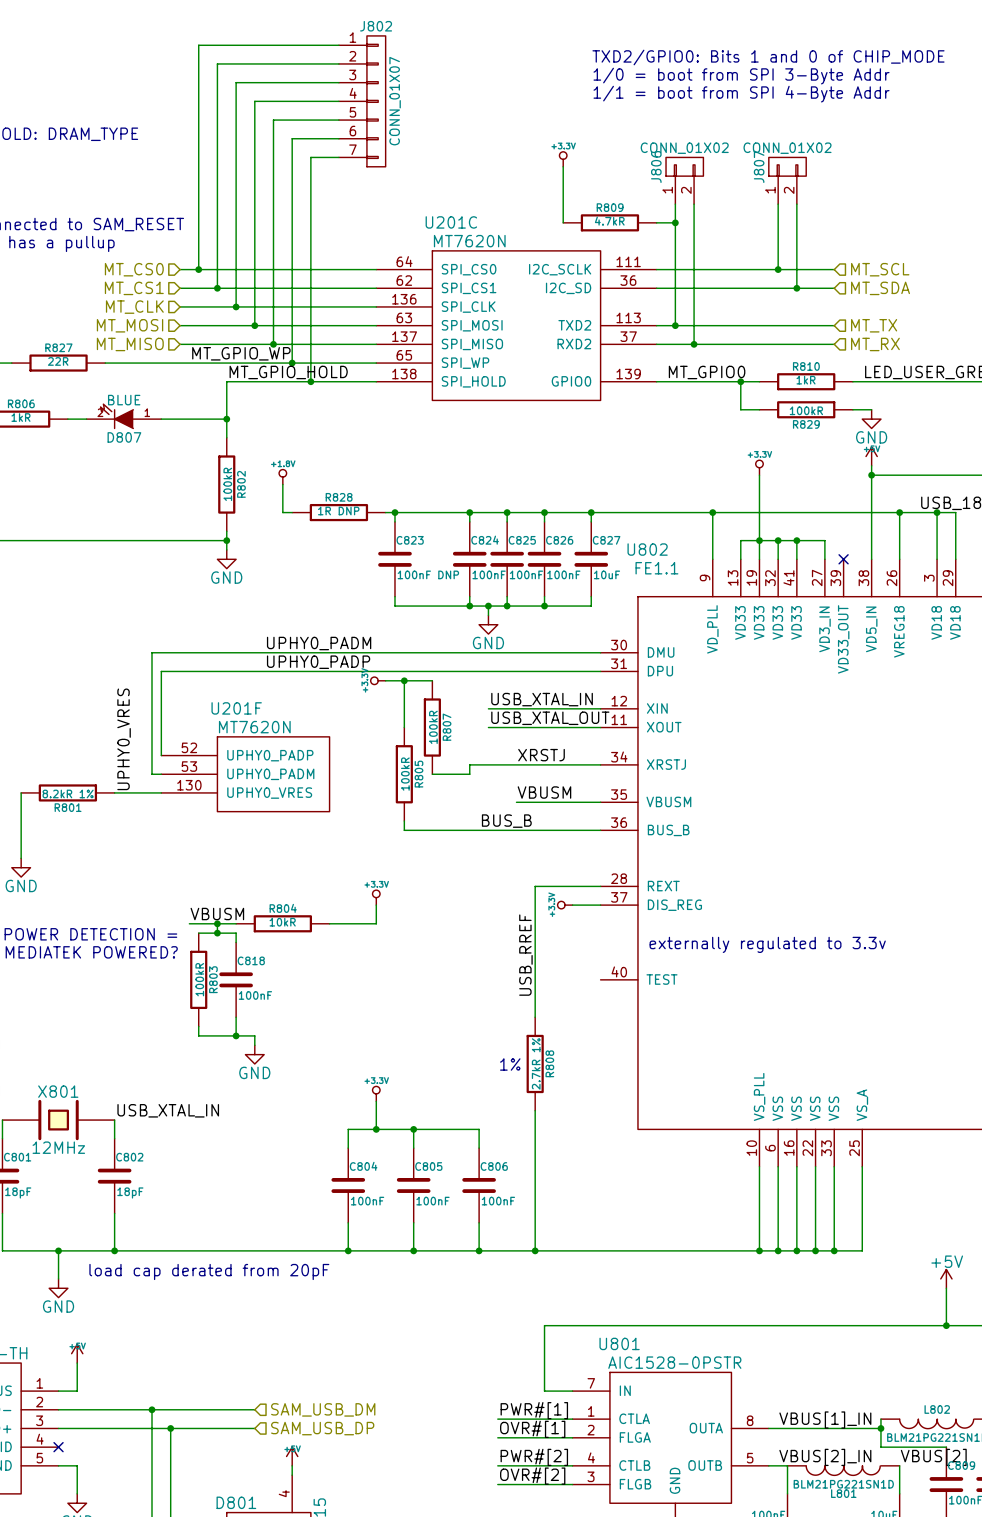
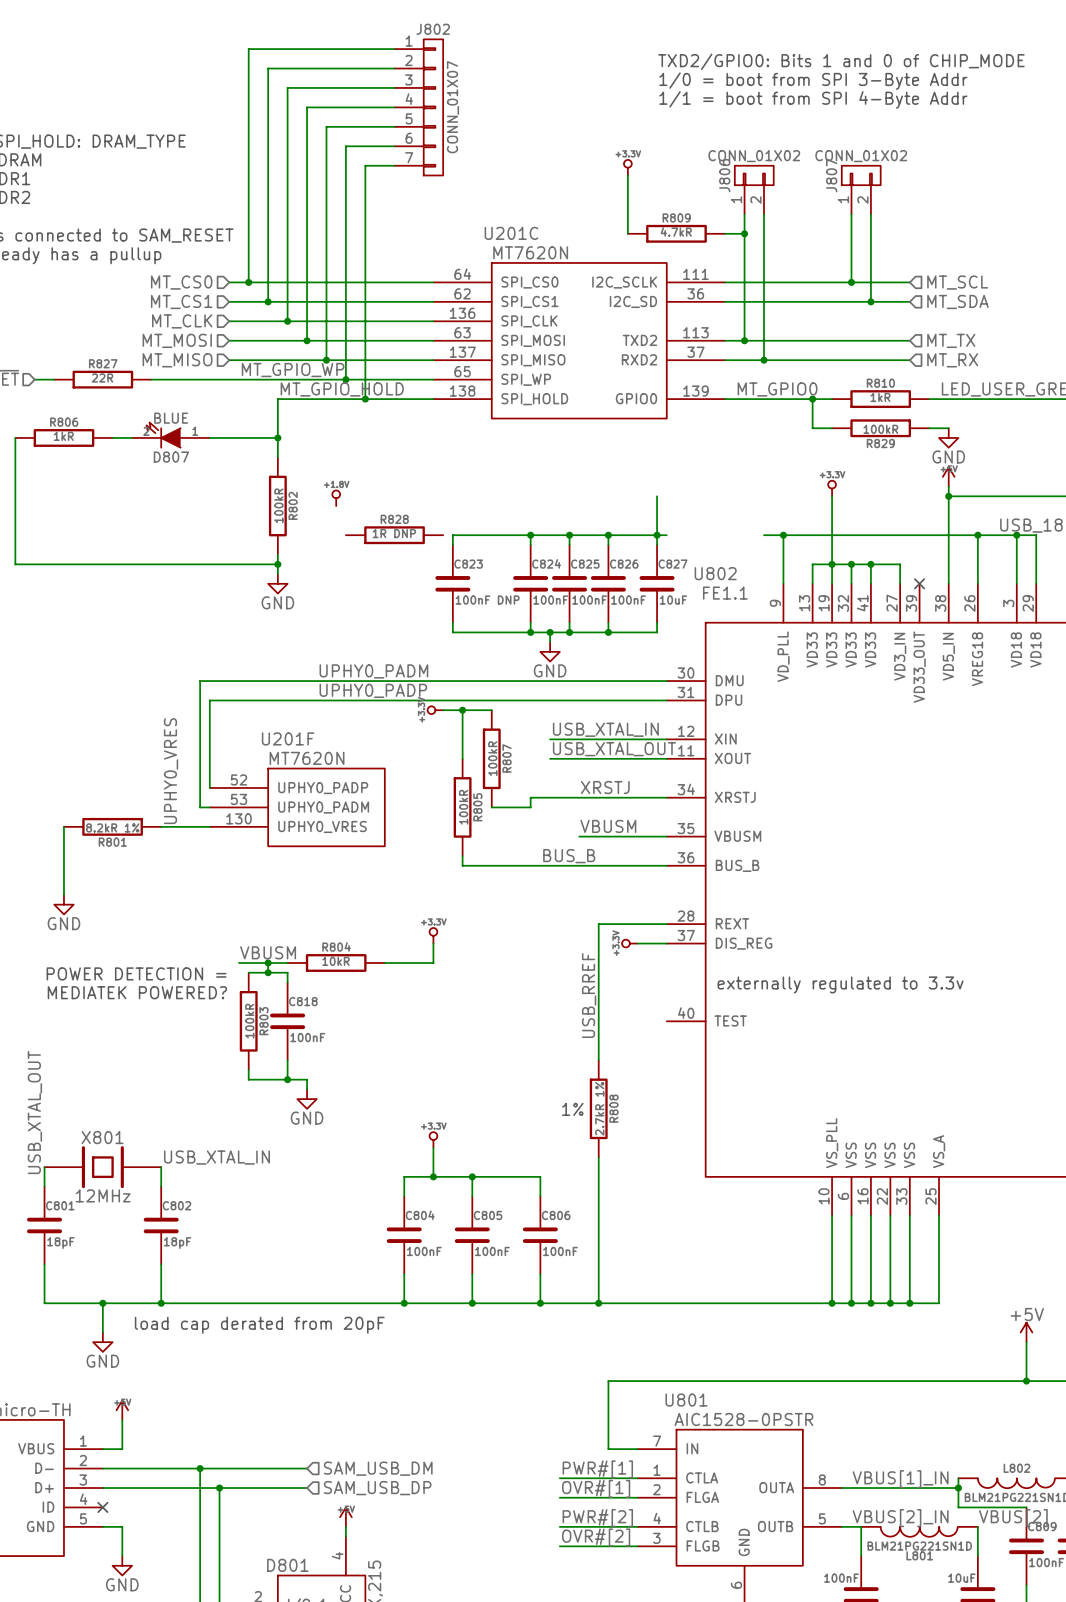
wire: none -> (657, 496) (657, 535)
wire: (282, 484) (282, 512) (292, 512) -> none
wire: (385, 512) (394, 512) -> none
junction: (394, 512) -> none
wire: (600, 512) (694, 512) -> none

